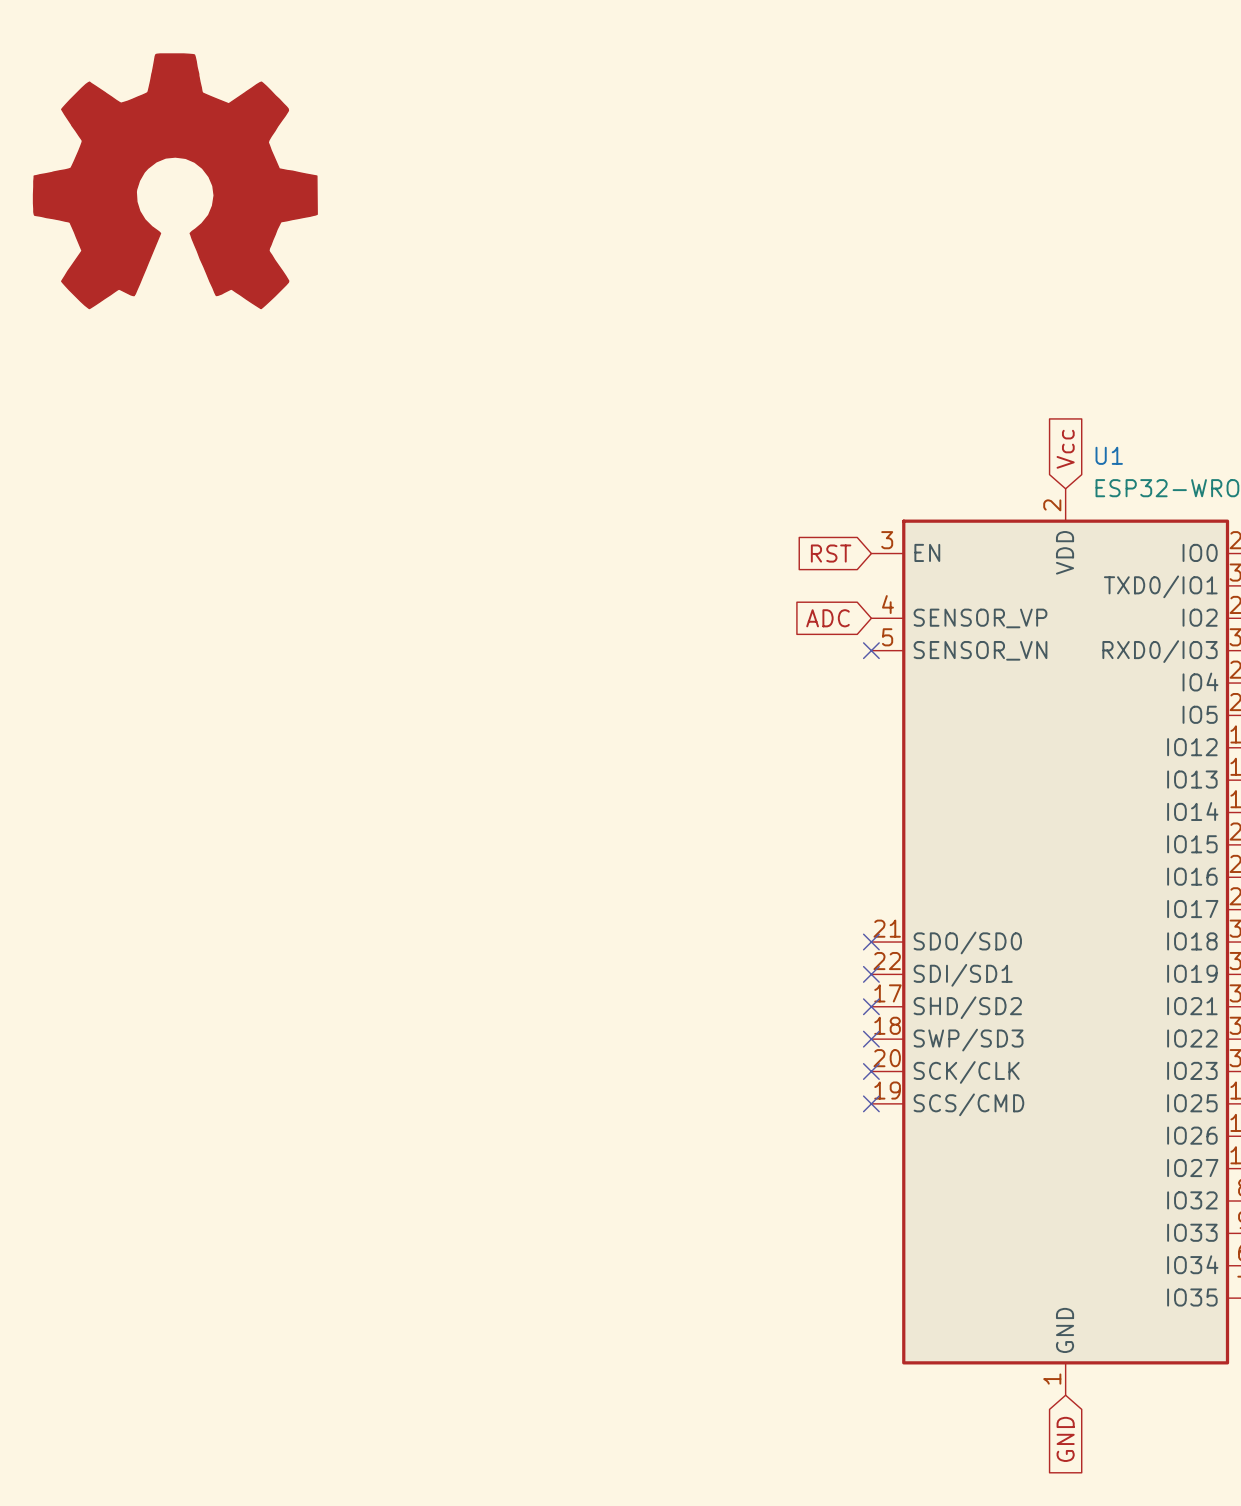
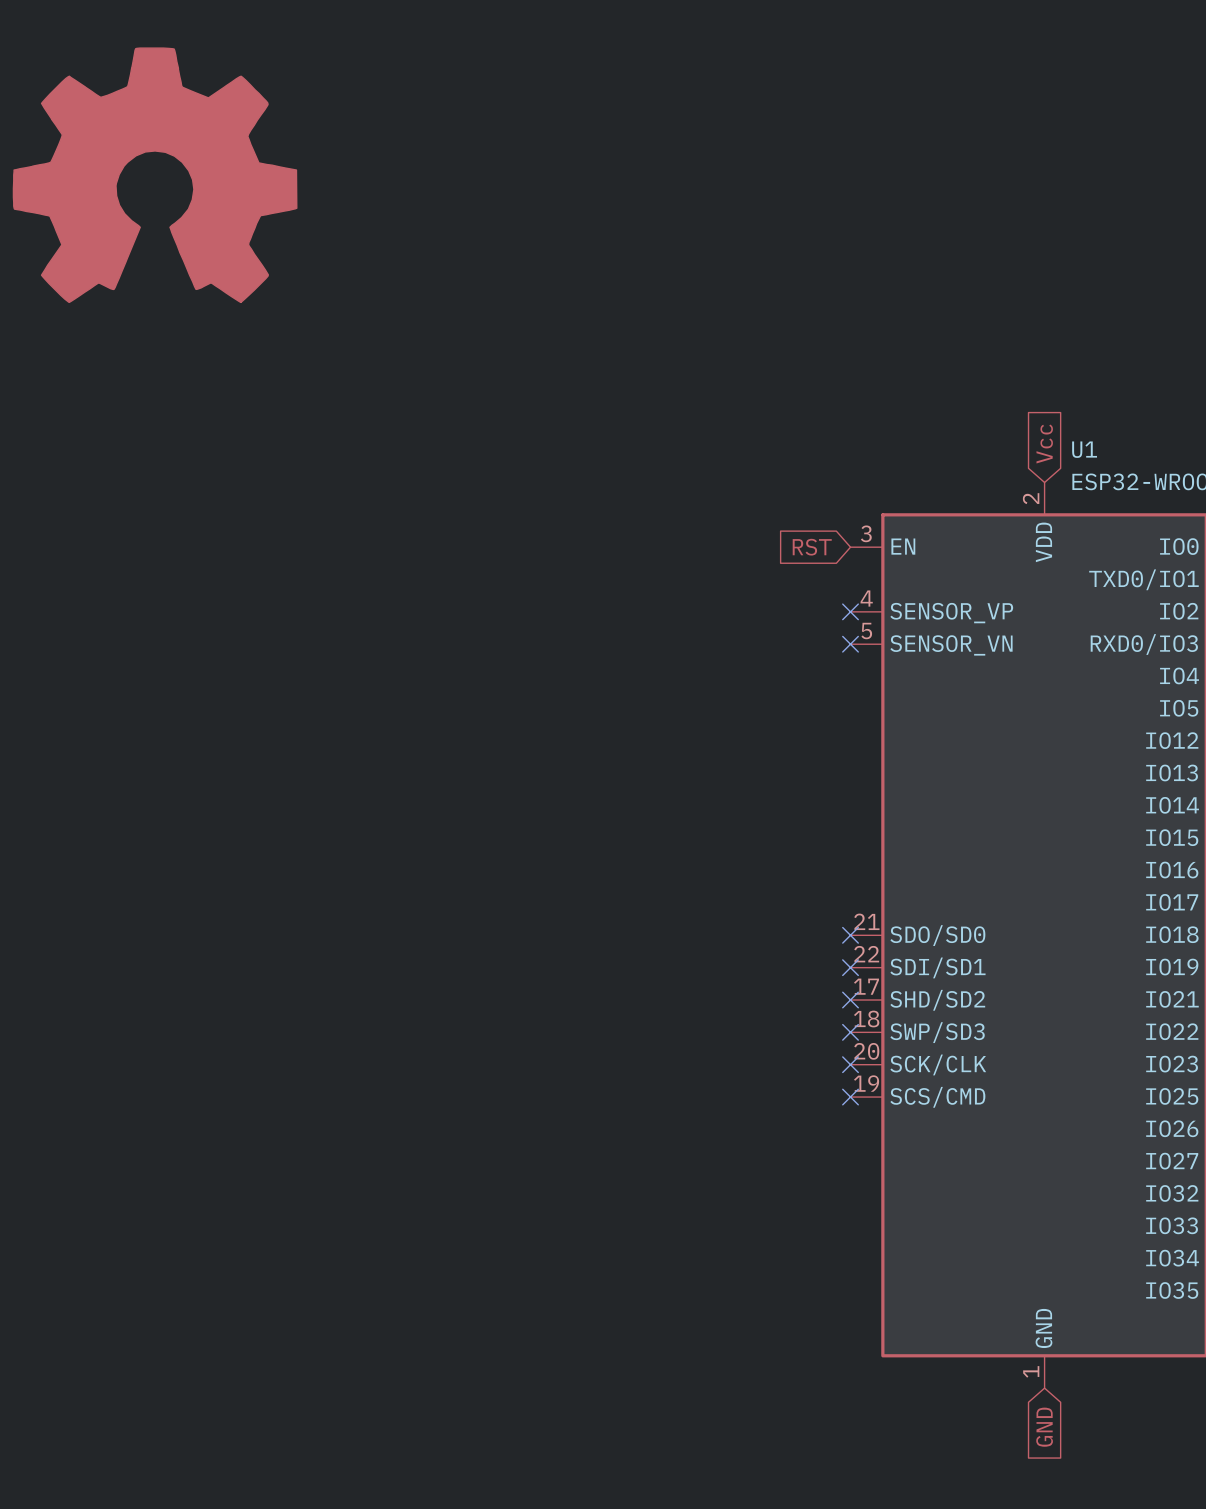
global label: ADC (828, 618) -> none
no-connect mark: none -> (850, 611)

